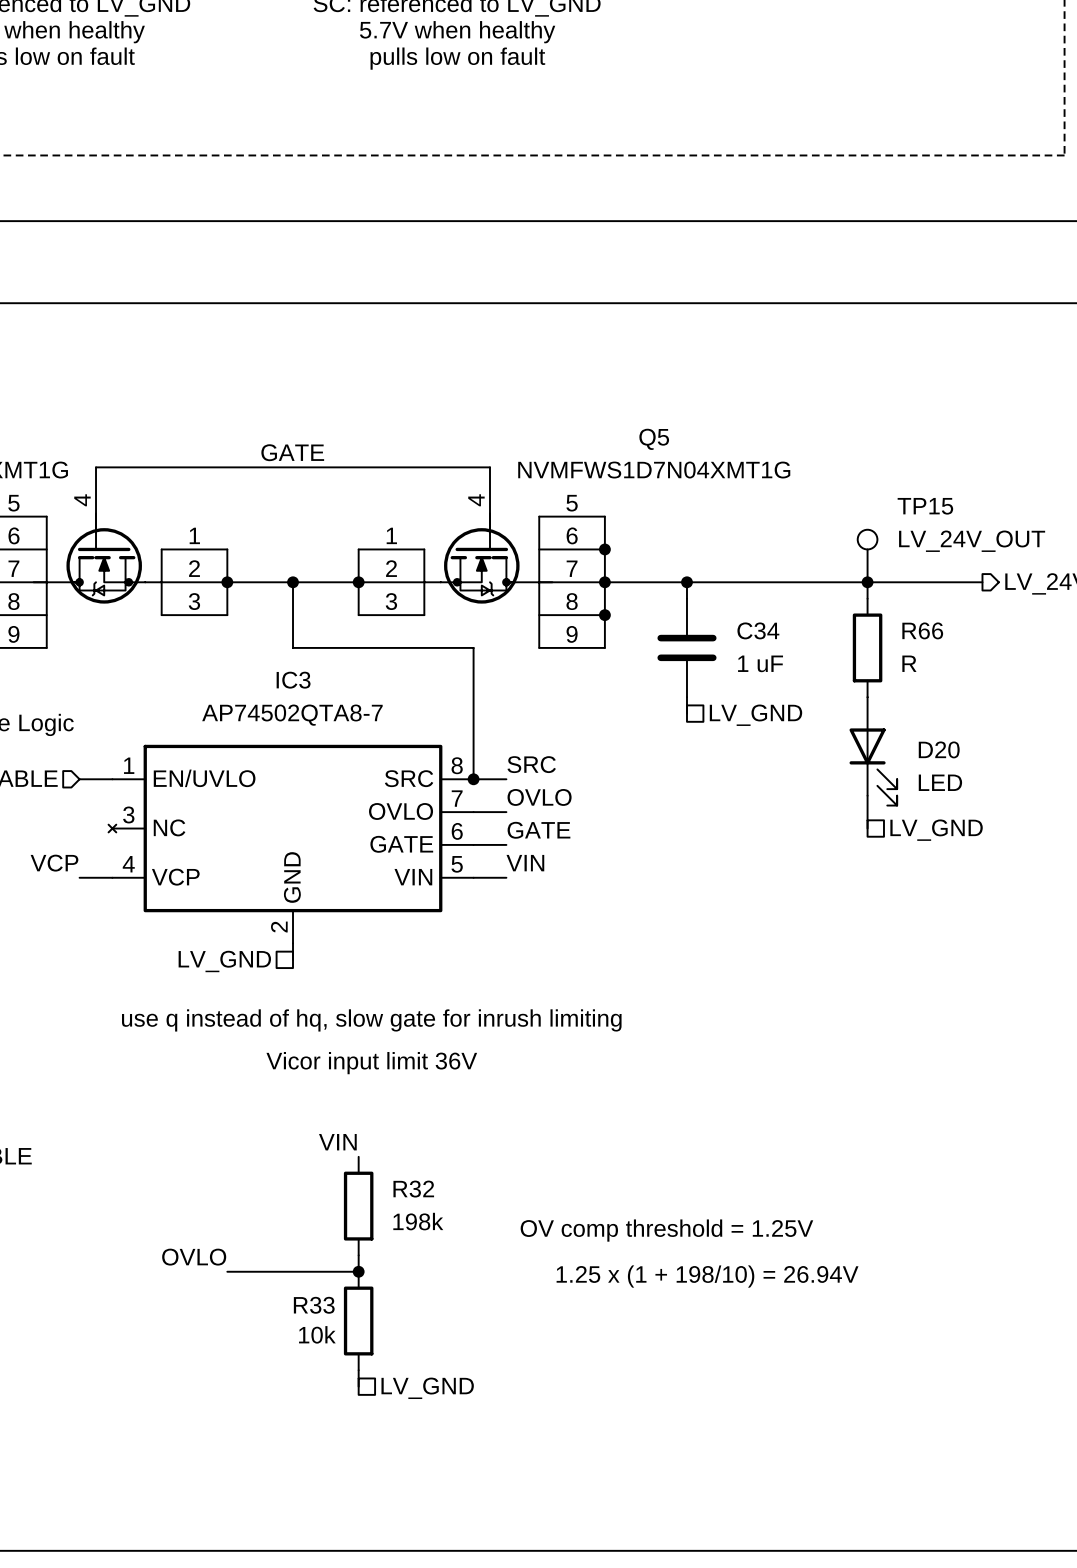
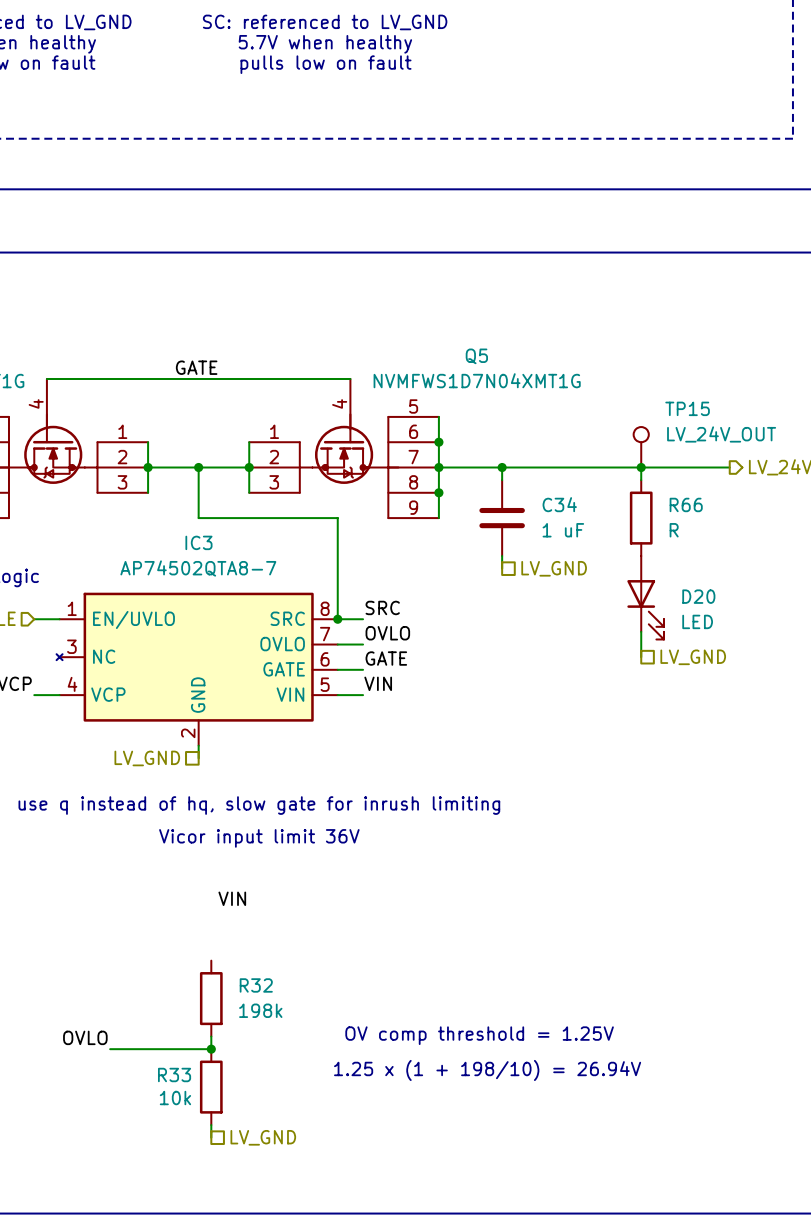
R32 position: (358, 1206) -> (211, 998)
text position: OV comp threshold = 1.25V (666, 1230) -> OV comp threshold = 1.25V (479, 1035)
wire: (358, 1255) (358, 1271) (227, 1271) -> (211, 1036) (211, 1049) (110, 1049)
label position: OVLO (194, 1257) -> OVLO (85, 1037)
junction: (358, 1271) -> none
text position: 1.25 x (1 + 198/10) = 26.94V (707, 1276) -> 1.25 x (1 + 198/10) = 26.94V (487, 1070)
R33 position: (358, 1321) -> (211, 1087)
junction: none -> (211, 1049)
wire: (358, 1370) (358, 1386) -> (211, 1125) (211, 1137)
hierarchical label position: LV_GND (427, 1388) -> LV_GND (263, 1137)

